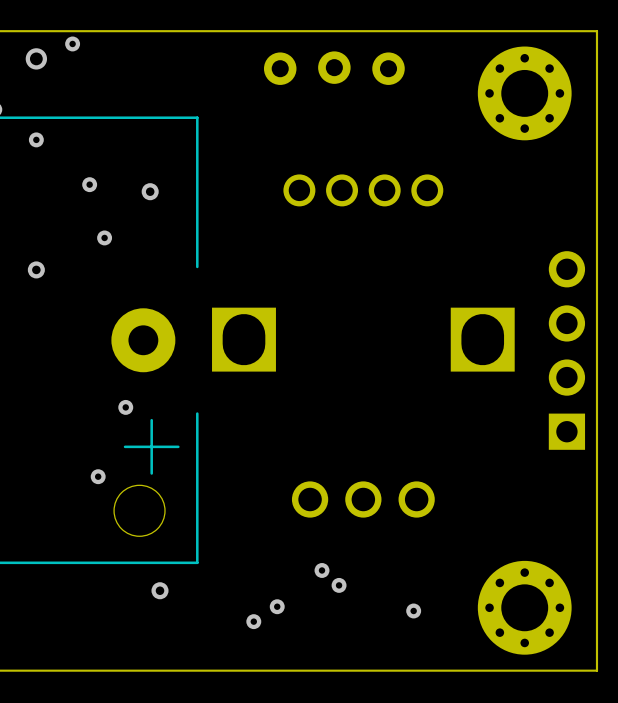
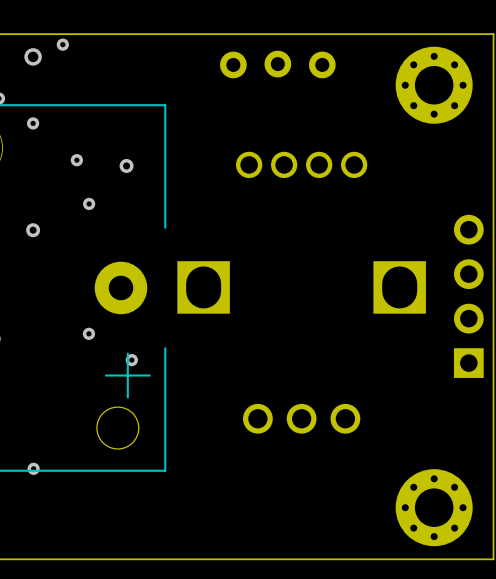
via: none -> (88, 333)
via: (125, 407) -> none
via: none -> (131, 360)
via: (98, 476) -> none
via: none -> (33, 468)
via: (322, 570) -> none
via: (339, 585) -> none
via: (160, 590) -> none
via: (277, 606) -> none
via: (413, 610) -> none
via: (253, 621) -> none

